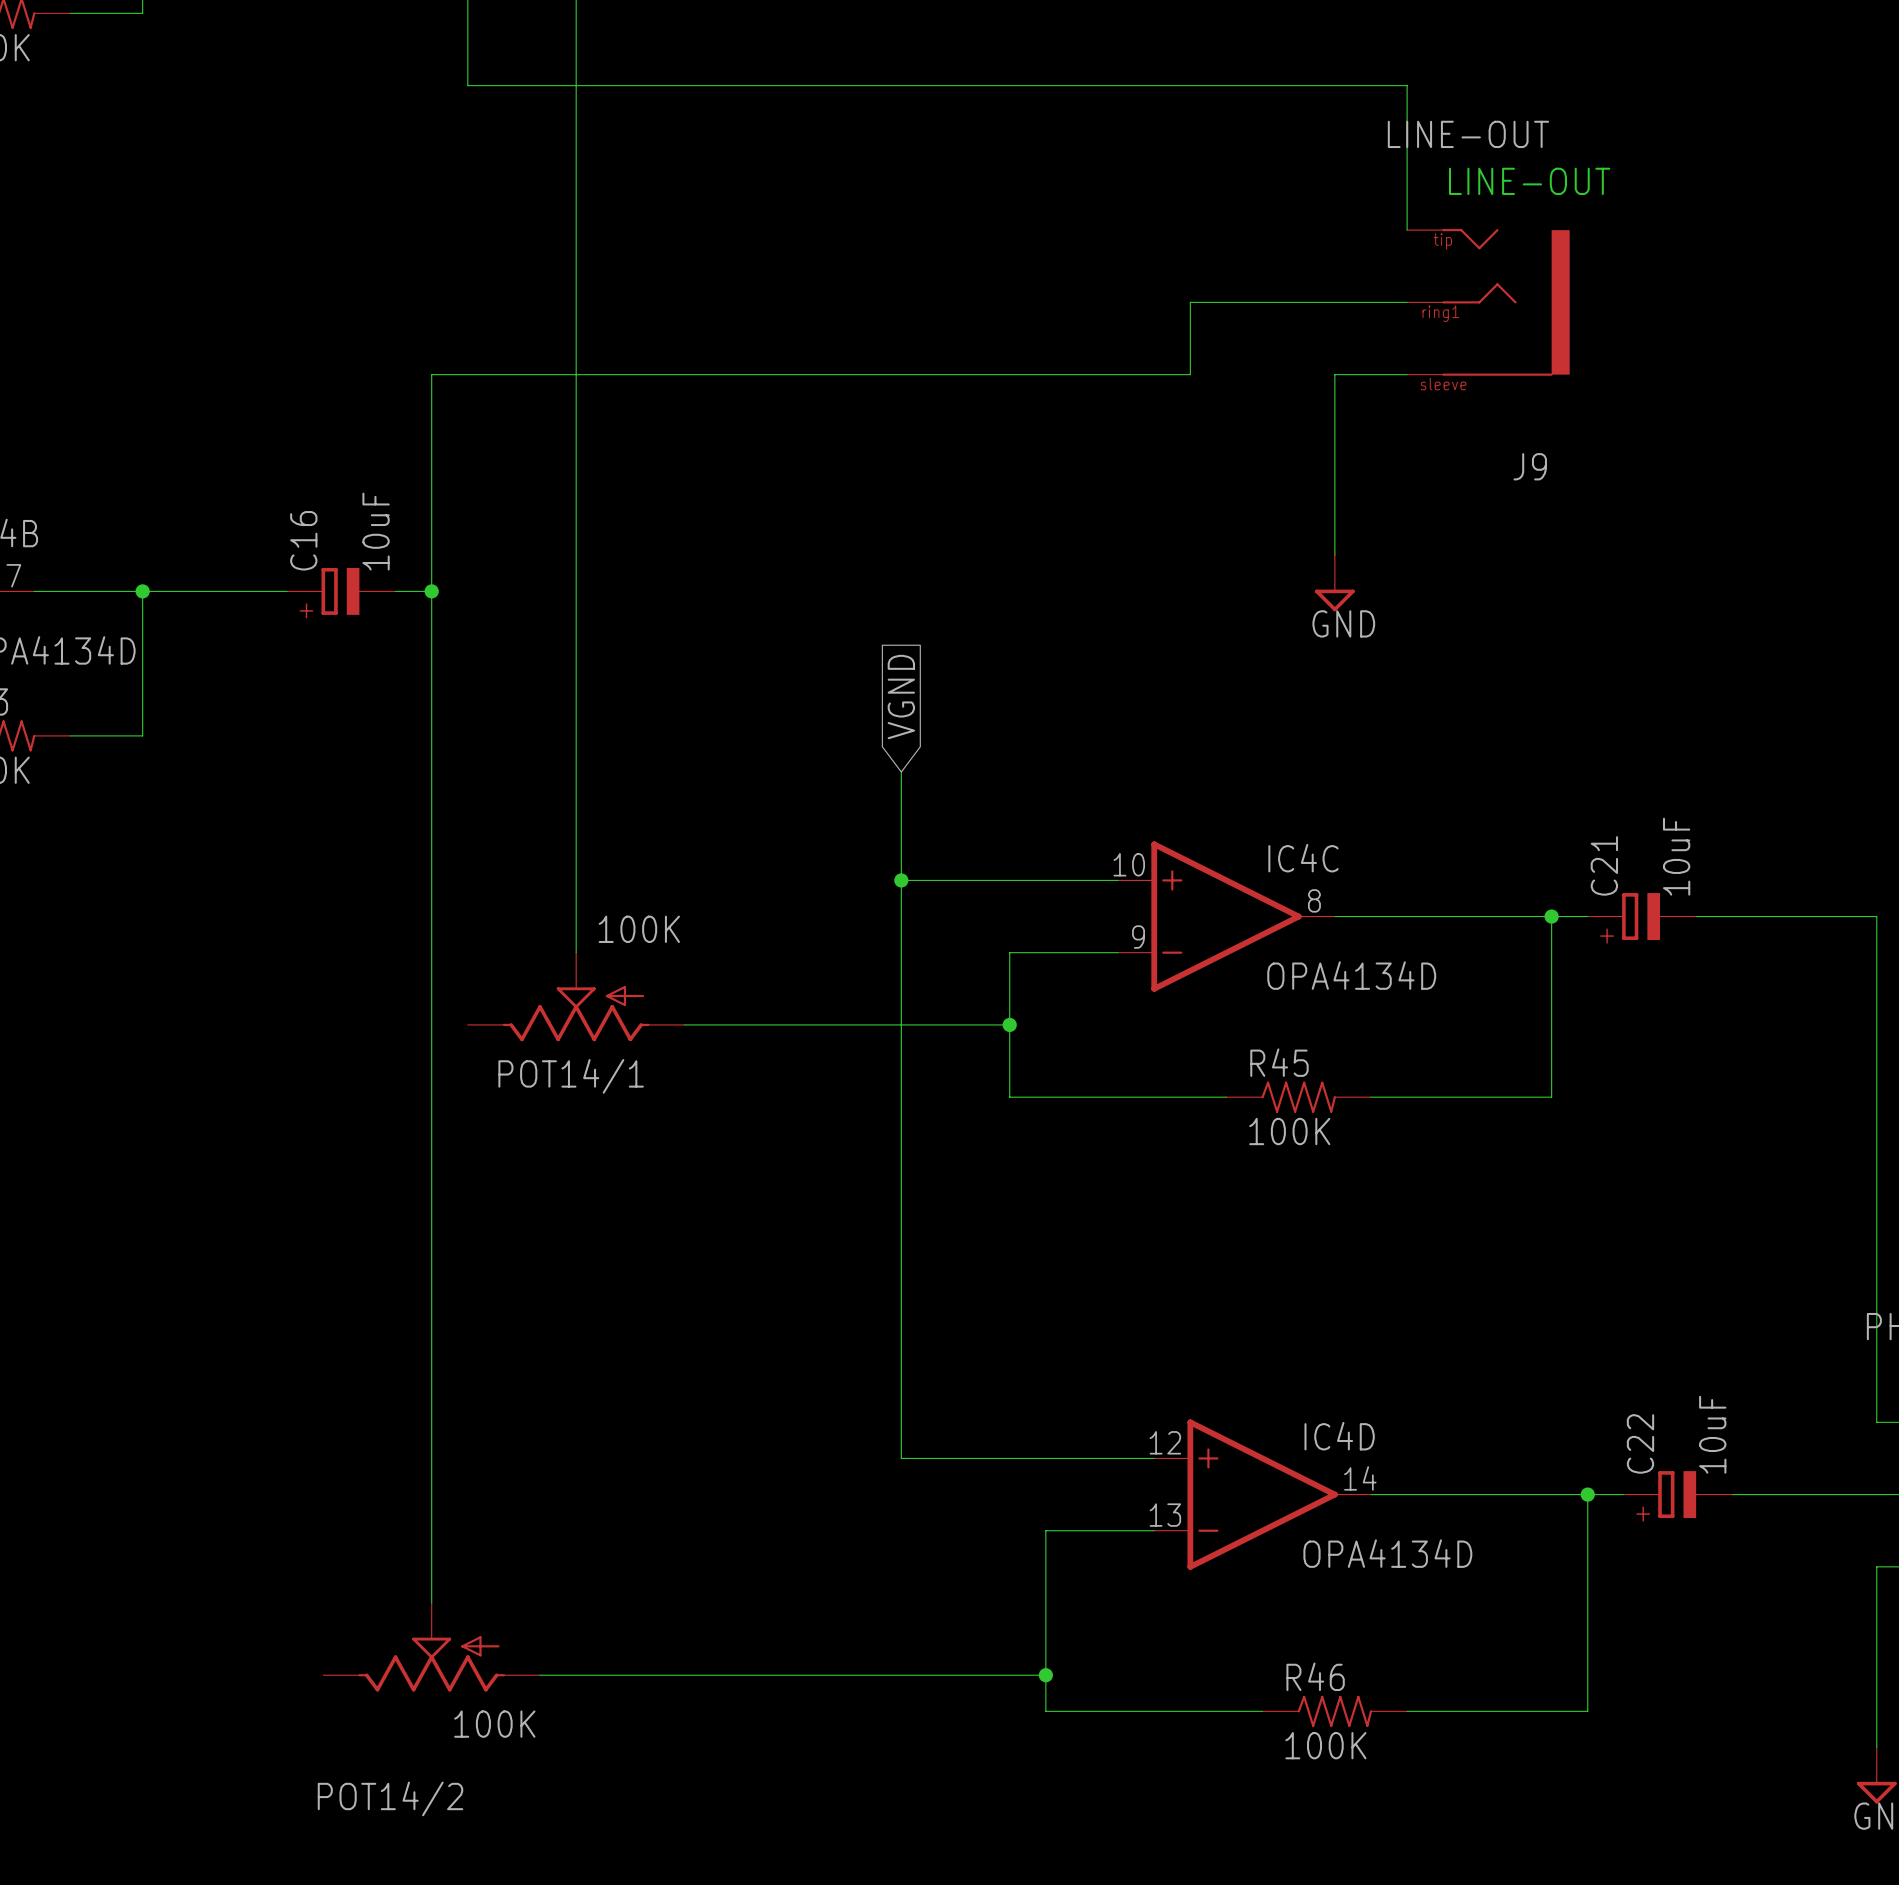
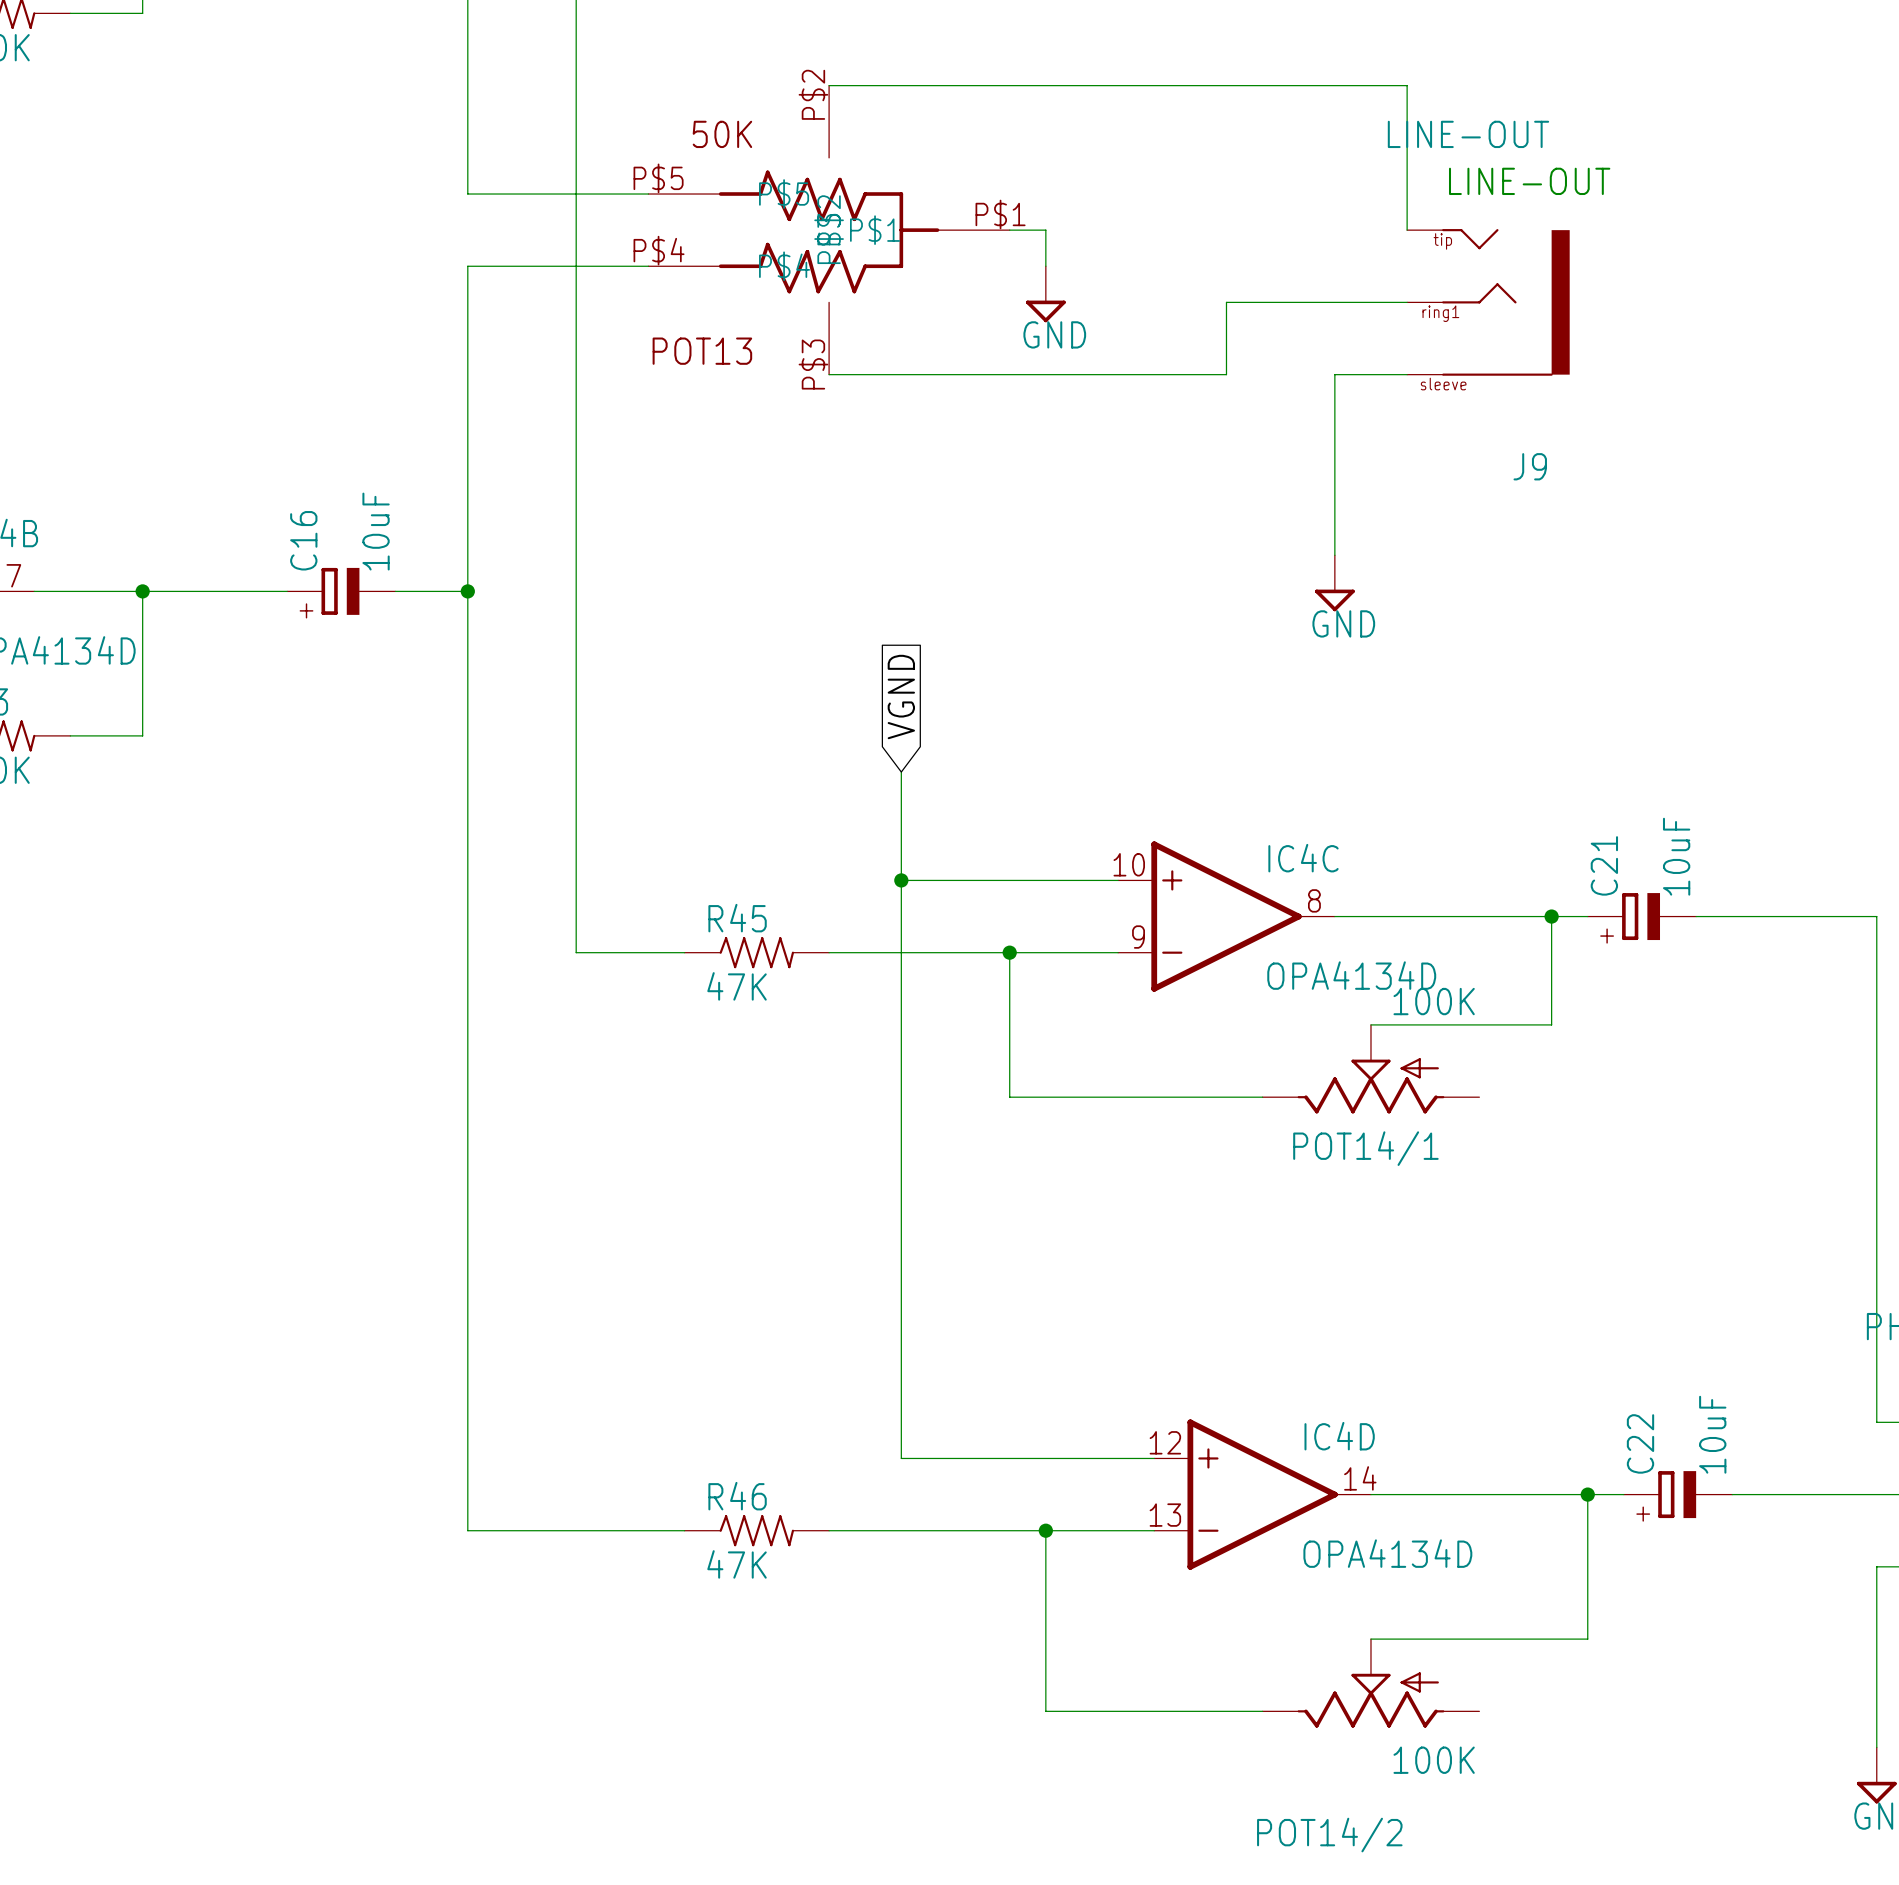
wire: (467, 85) (829, 85) -> (467, 85) (467, 194) (648, 194)
POT13: none -> 50K (829, 230)
wire: none -> (1009, 230) (1045, 230) (1045, 266)
wire: none -> (648, 266) (467, 266) (467, 1530) (684, 1530)
power symbol: none -> GND (1045, 294)
wire: (1226, 302) (1190, 302) (1190, 374) -> (1226, 302) (1226, 374) (1190, 374)
wire: (829, 374) (431, 374) (431, 1602) -> none
wire: none -> (431, 591) (467, 591)
junction position: (431, 591) -> (467, 591)
wire: none -> (576, 952) (684, 952)
wire: none -> (829, 952) (1009, 952)
POT14/1 position: (576, 996) -> (1370, 1069)
wire: (684, 1024) (1009, 1024) -> none
junction position: (1009, 1024) -> (1009, 952)
wire: (1551, 1024) (1551, 1097) (1370, 1097) -> (1551, 1024) (1370, 1024)
R45 position: (1298, 1097) -> (756, 952)
R45 value: 100K (1289, 1131) -> 47K (737, 986)
wire: none -> (829, 1530) (1045, 1530)
junction: none -> (1045, 1530)
wire: (1587, 1639) (1587, 1711) (1407, 1711) -> (1587, 1639) (1370, 1639)
POT14/2 position: (431, 1647) -> (1370, 1683)
wire: (540, 1675) (1045, 1675) -> none
junction: (1045, 1675) -> none
R46 position: (1334, 1711) -> (756, 1530)
R46 value: 100K (1325, 1745) -> 47K (737, 1564)

